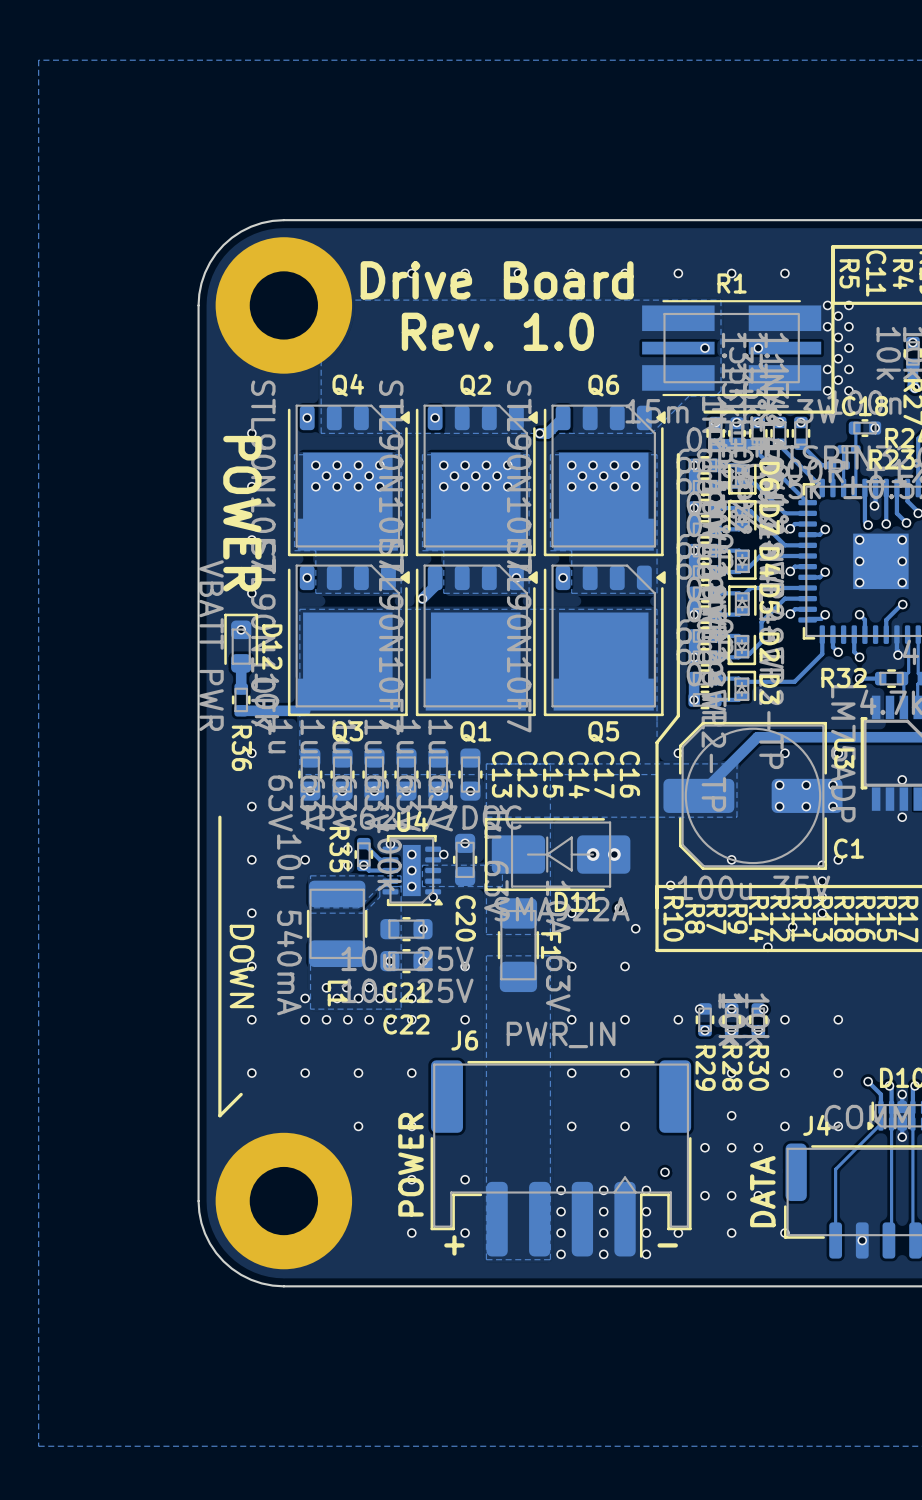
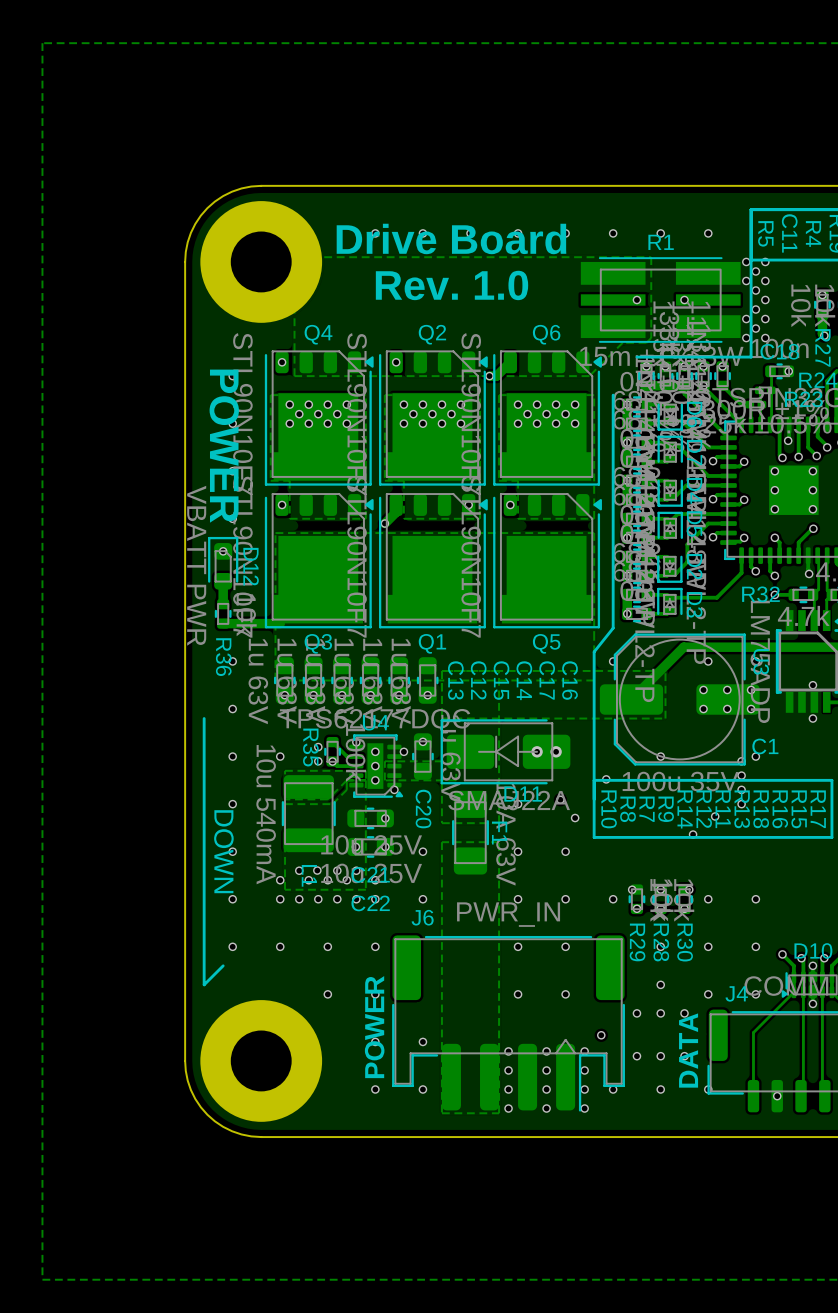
text: + (454, 1245) -> none
text: - (667, 1245) -> none

